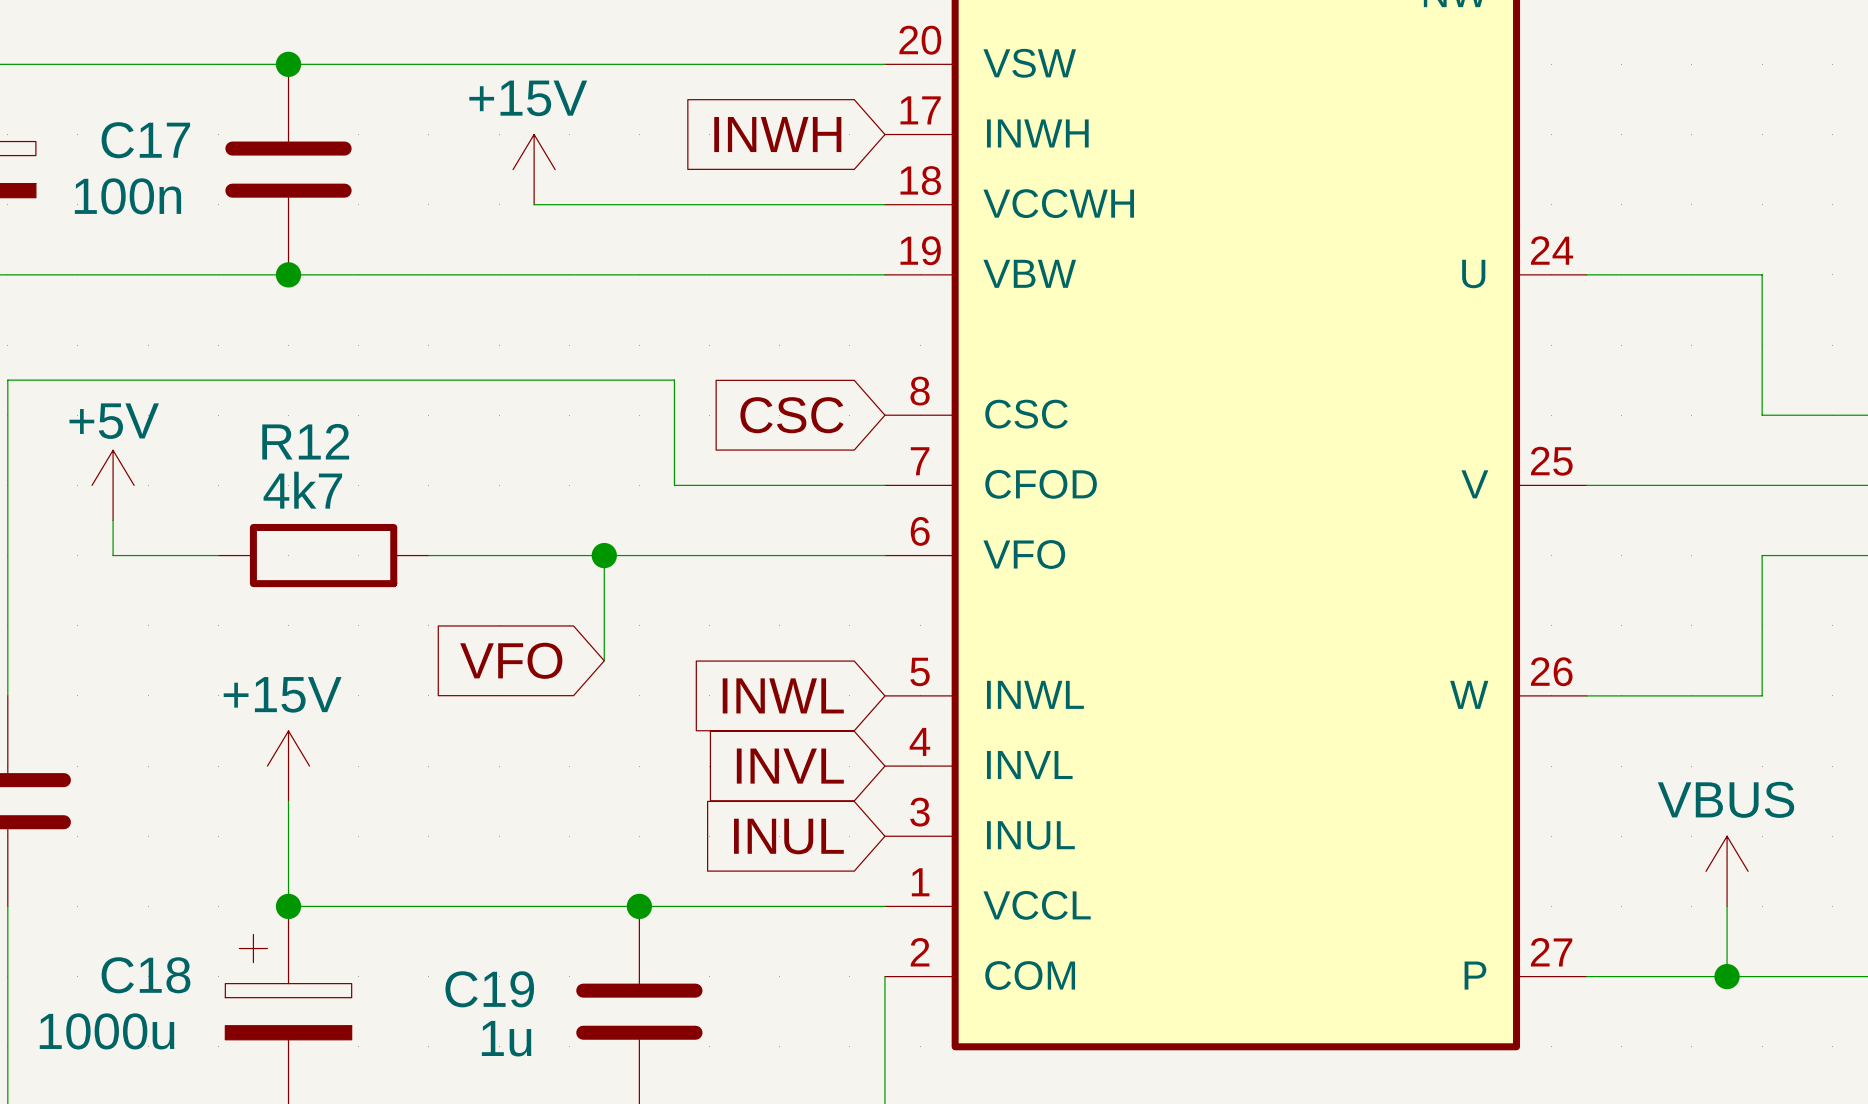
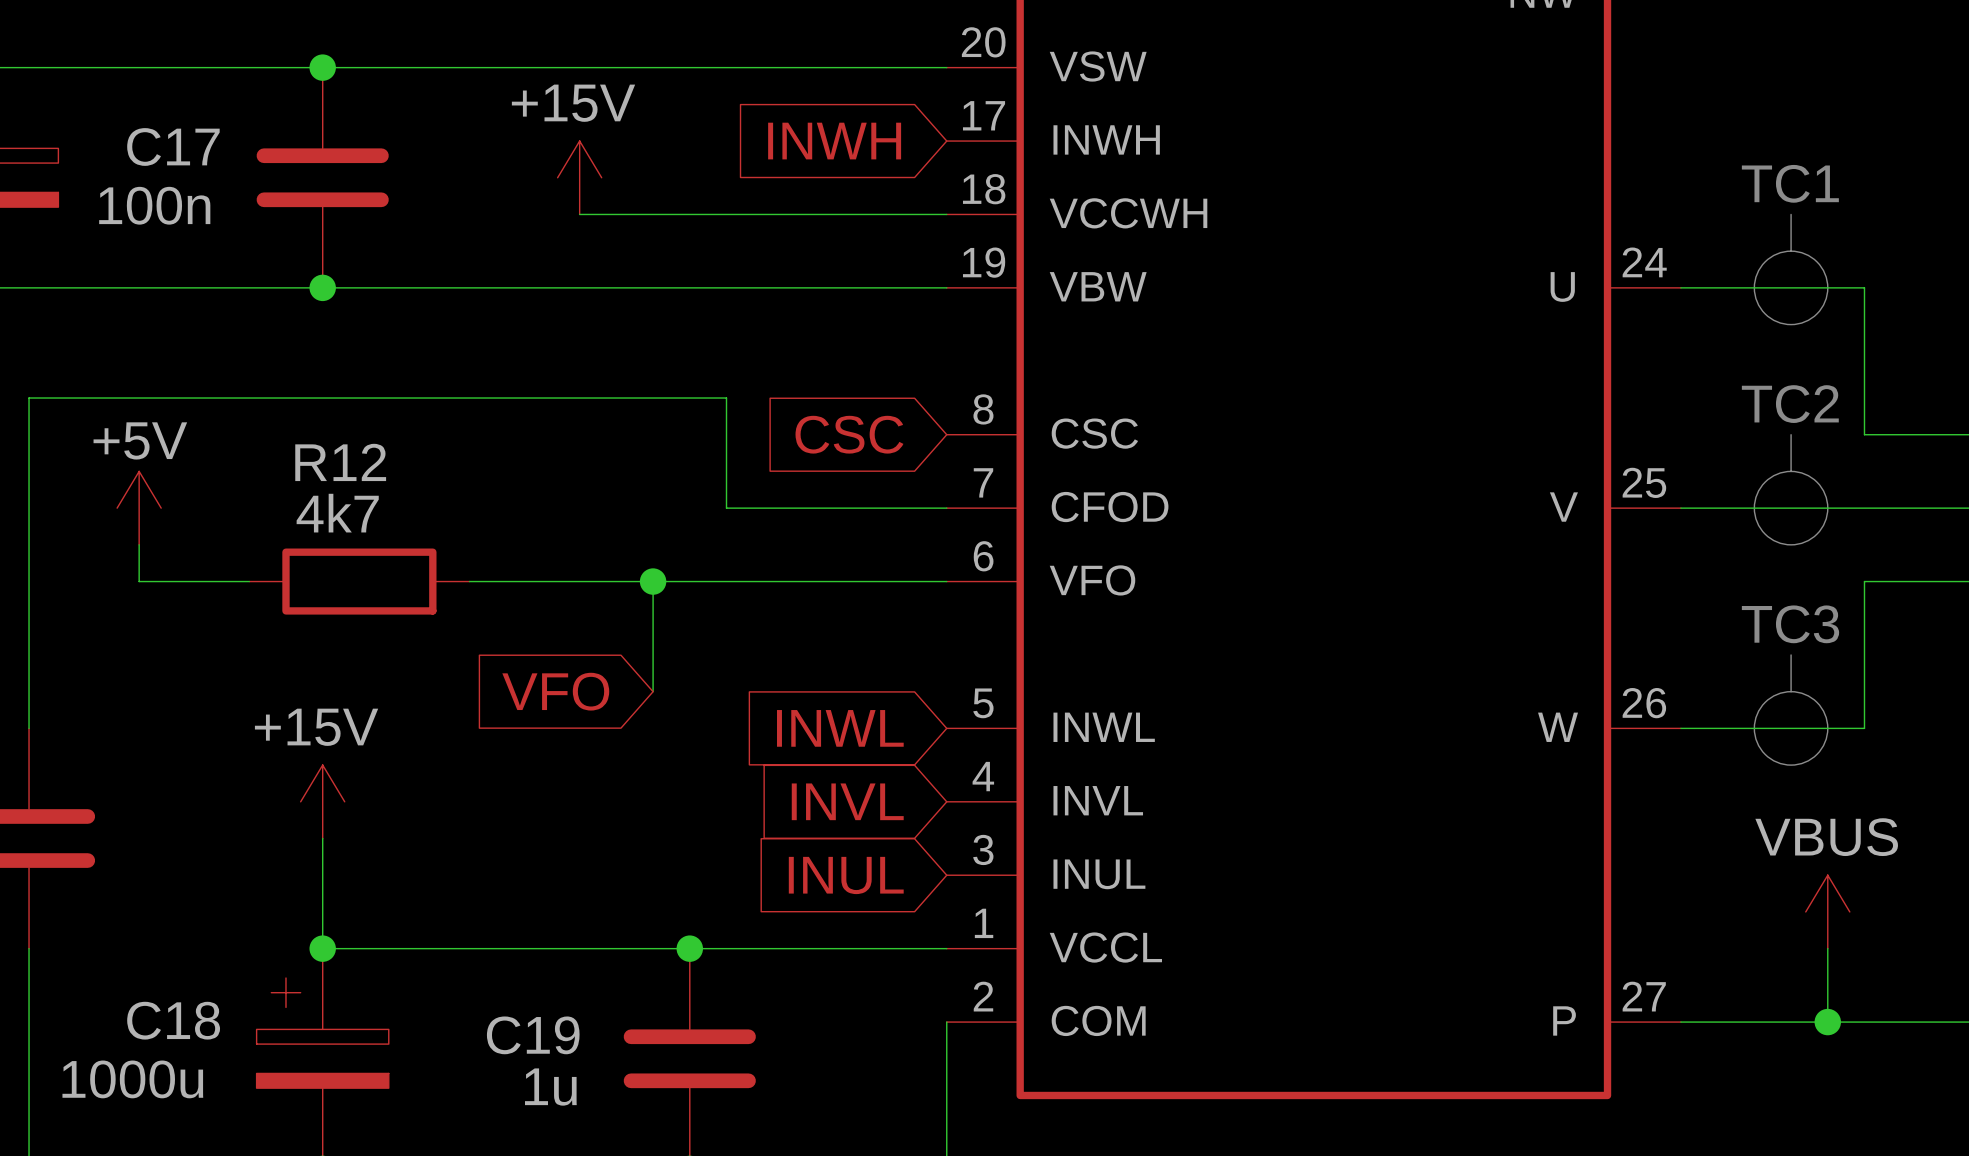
text: none -> TC1 (1790, 183)
line: none -> (1791, 214) (1791, 251)
drawing: none -> [1754, 251, 1828, 325]
text: none -> TC2 (1790, 404)
line: none -> (1791, 434) (1791, 471)
drawing: none -> [1754, 471, 1828, 545]
text: none -> TC3 (1790, 624)
line: none -> (1791, 654) (1791, 691)
drawing: none -> [1754, 691, 1828, 766]

